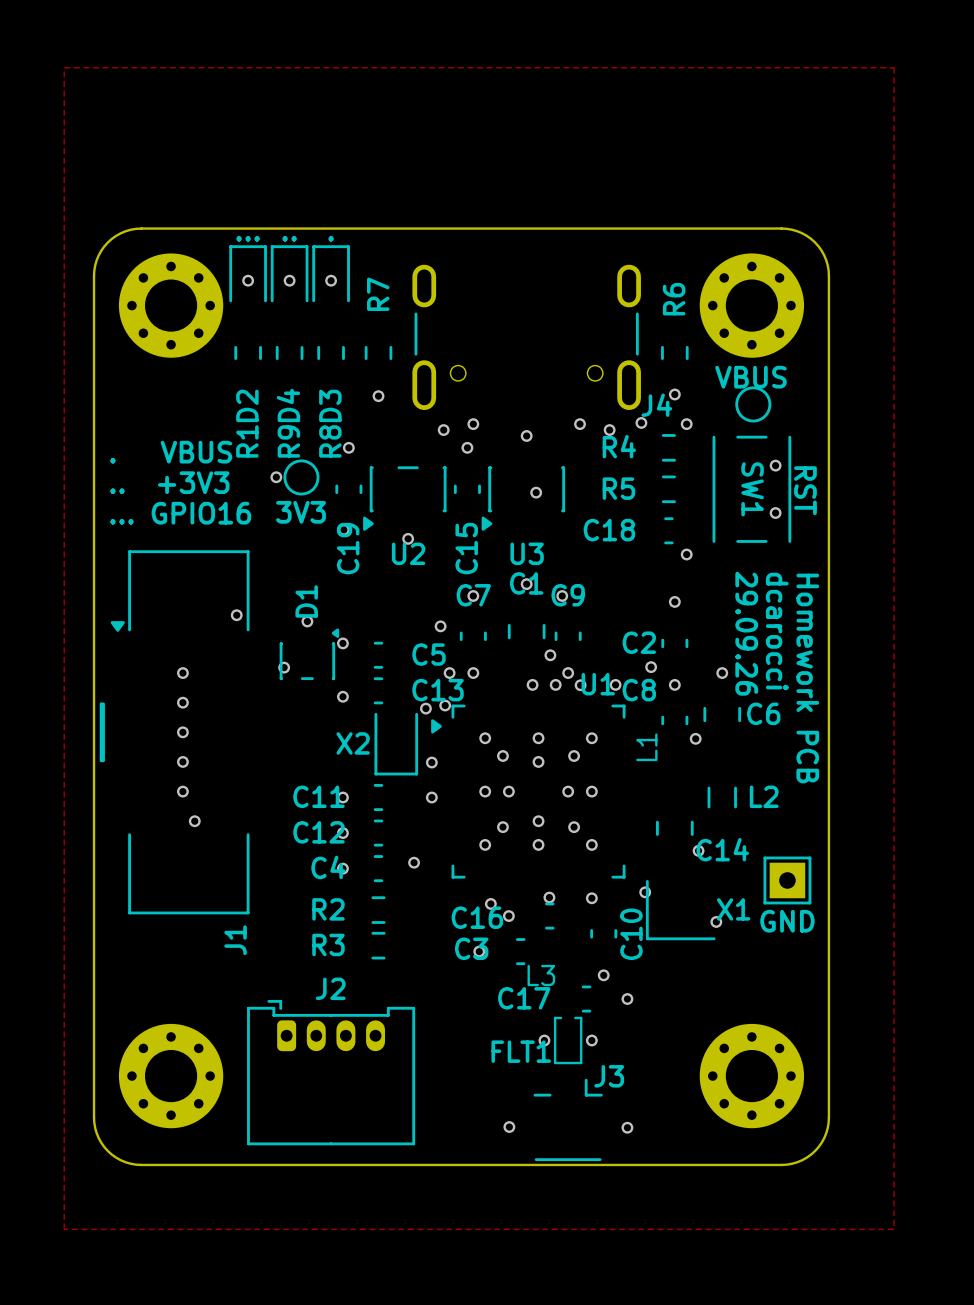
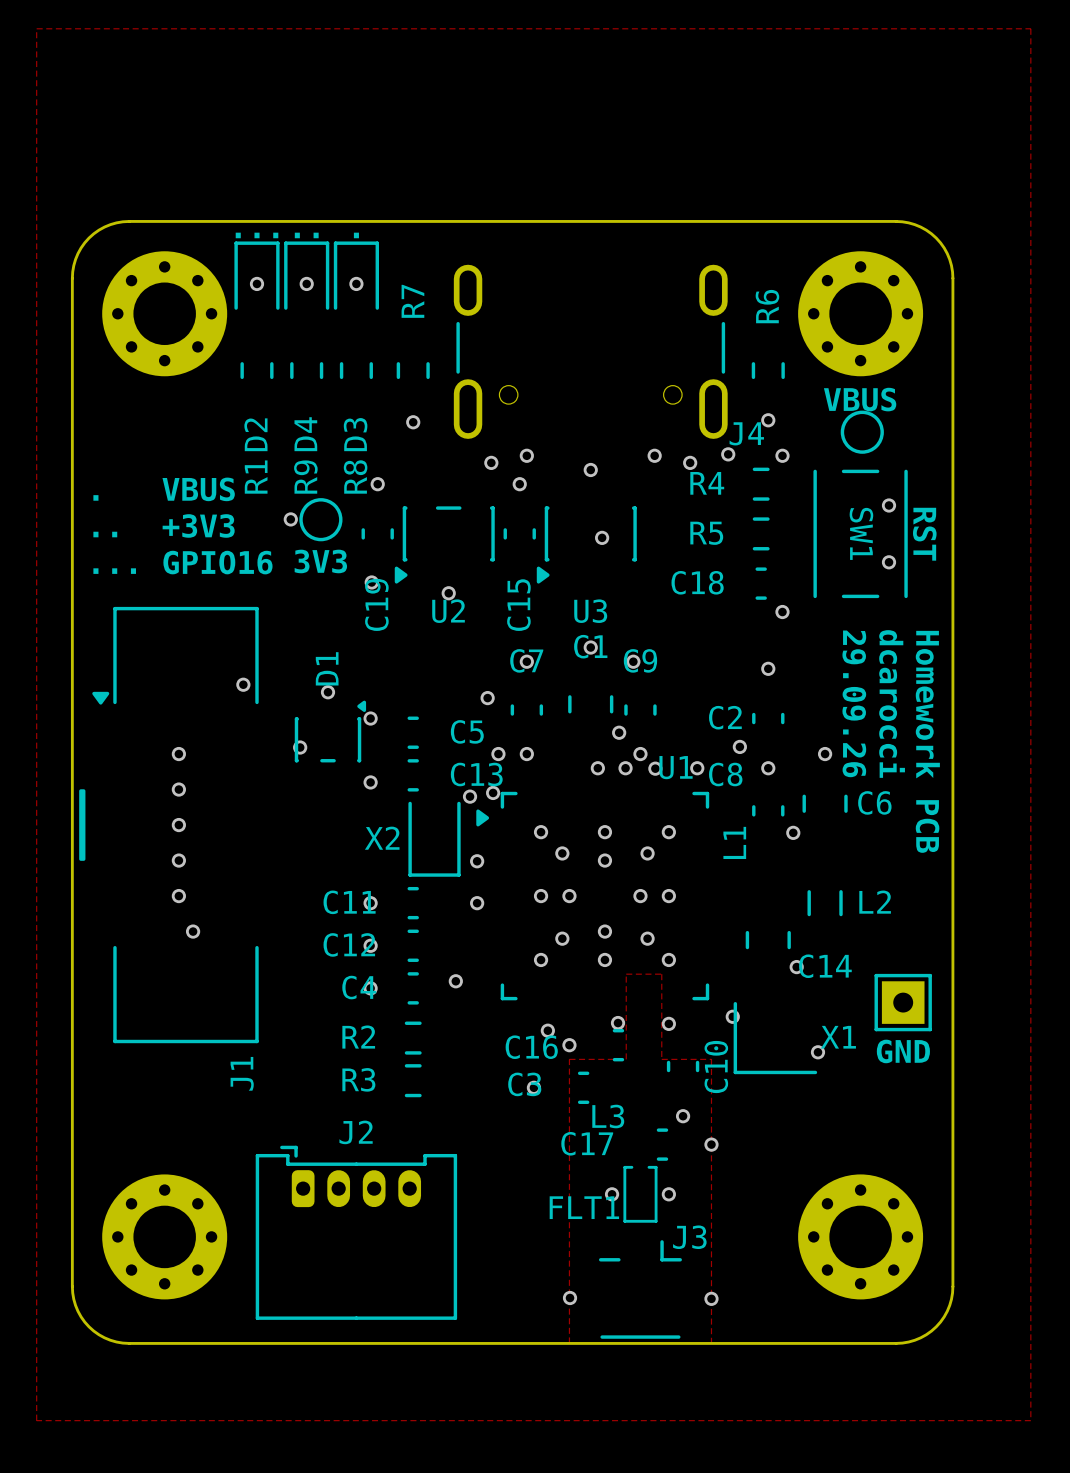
zone outline: none -> (626, 974) (661, 974) (661, 1059) (711, 1059) (711, 1343) (569, 1343) (569, 1059) (626, 1059) (626, 974)

